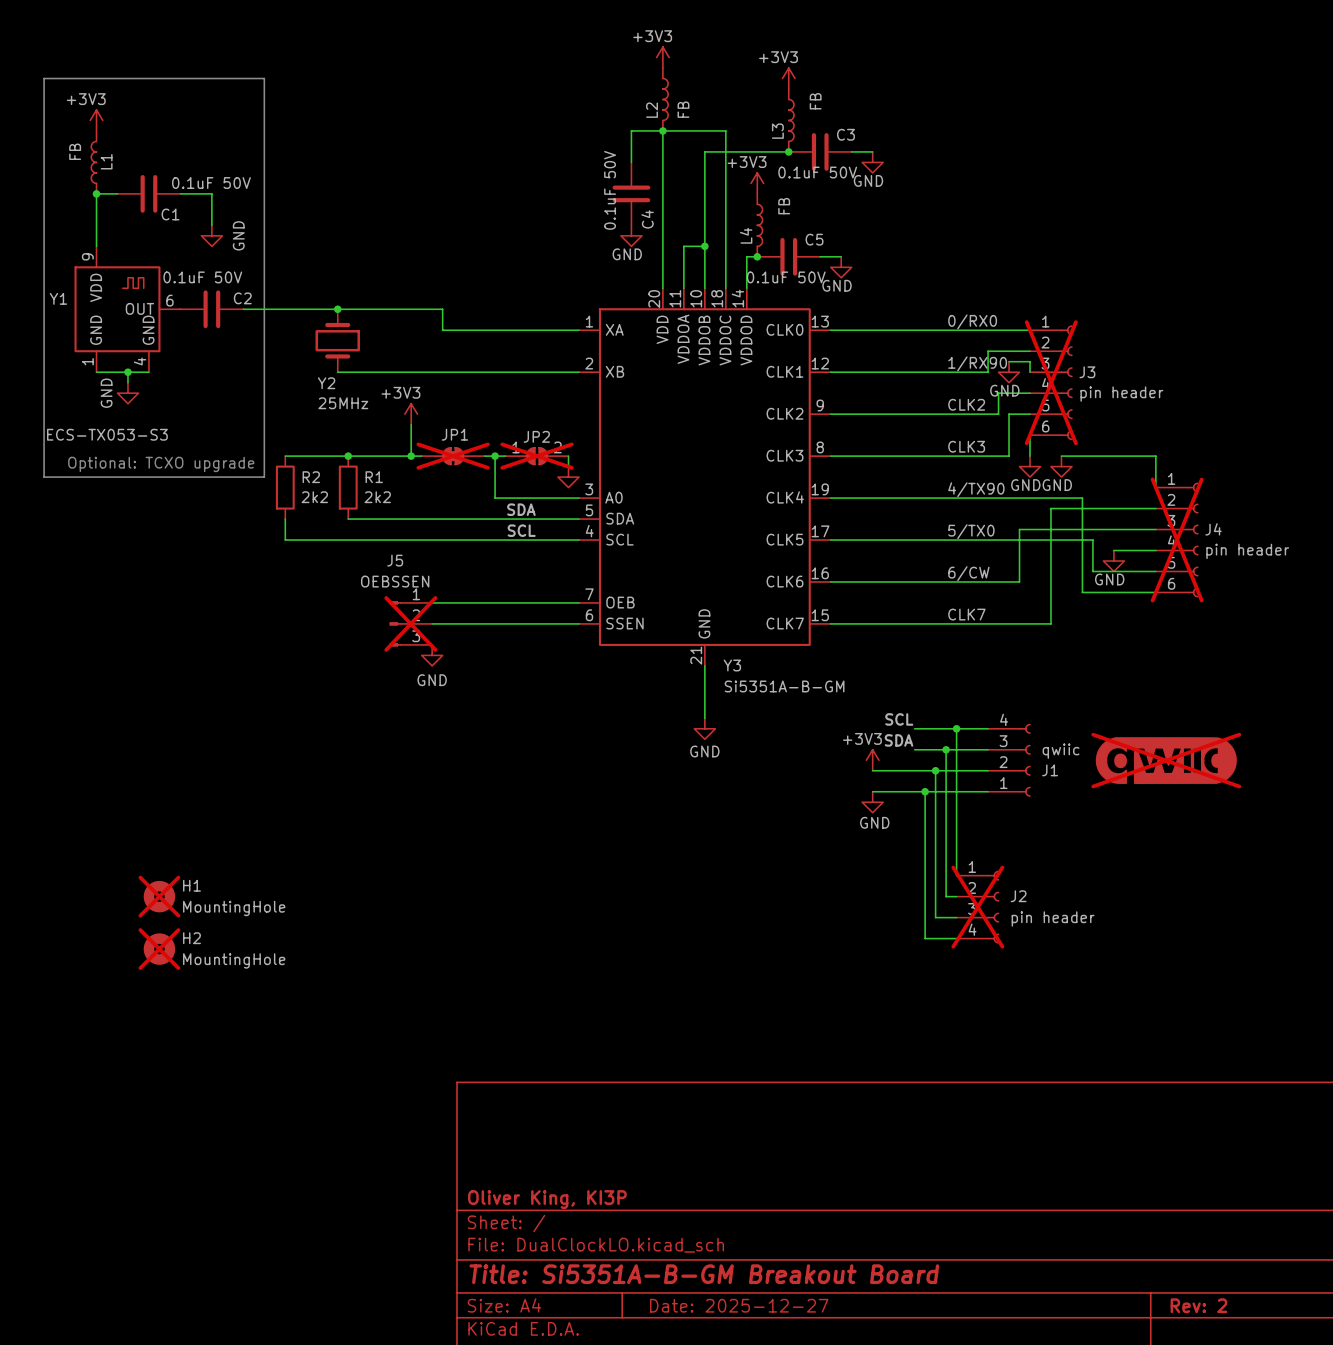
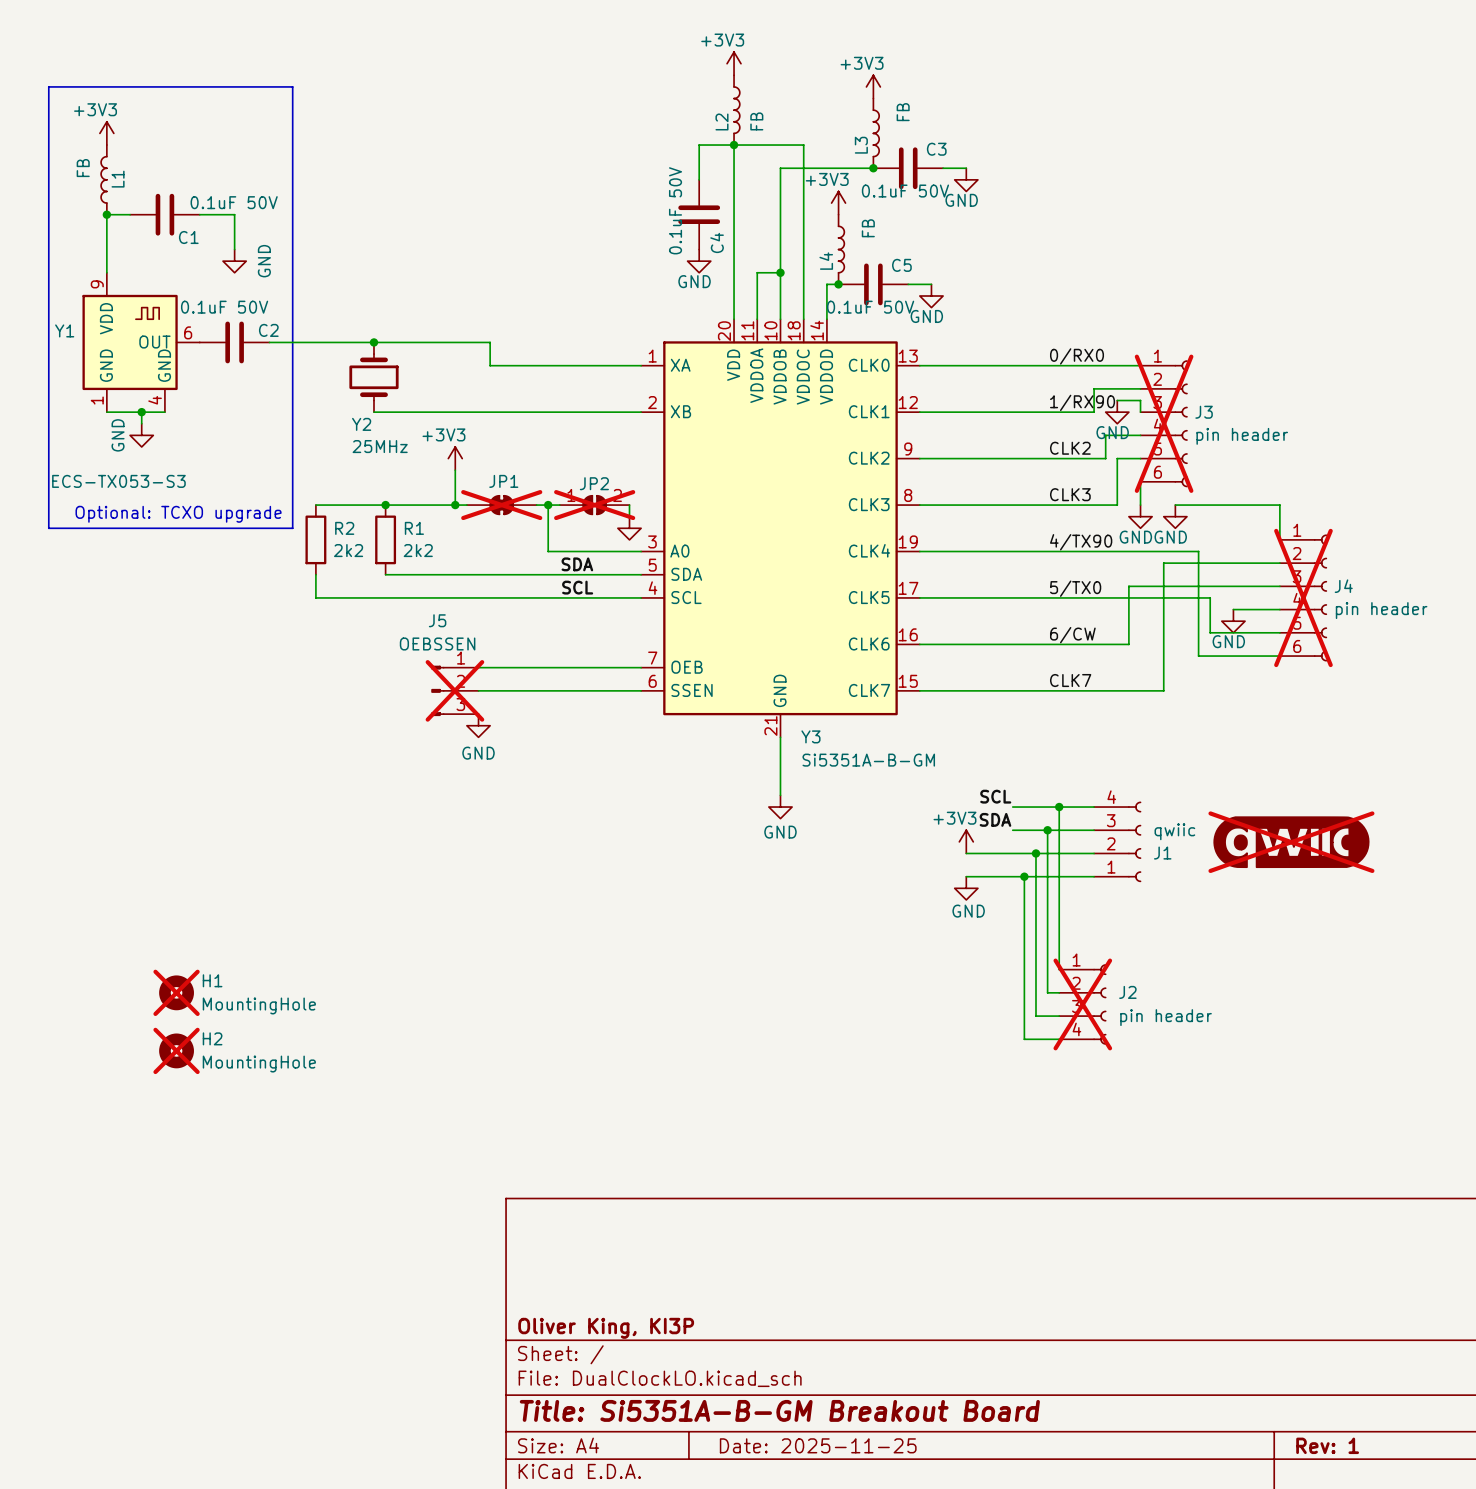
title block: Date: 2025-12-27 (739, 1305) -> Date: 2025-11-25 (818, 1445)
title block: Rev: 2 (1198, 1305) -> Rev: 1 (1327, 1445)

